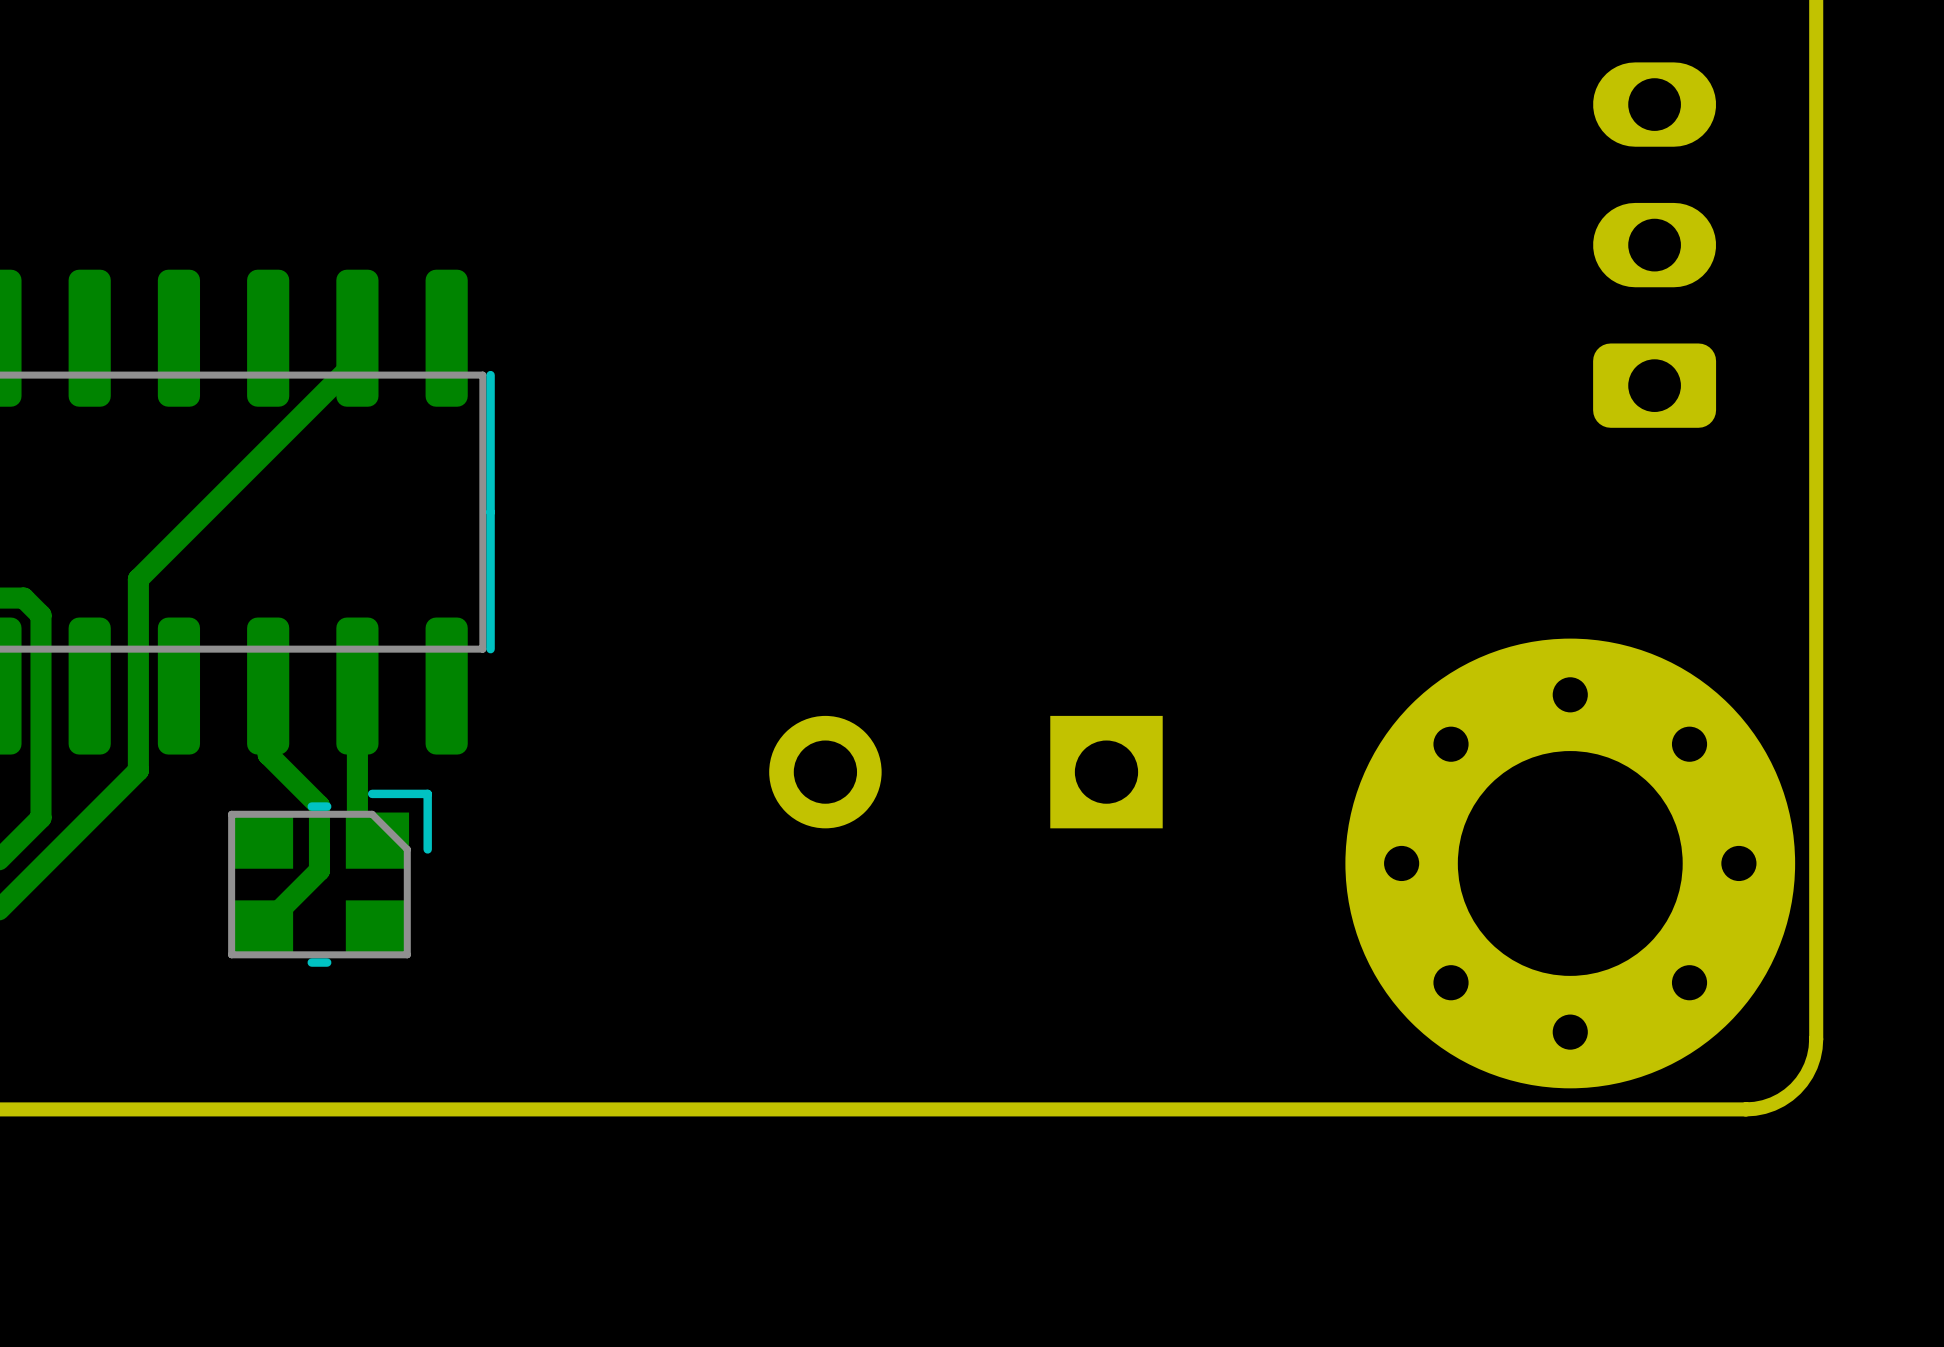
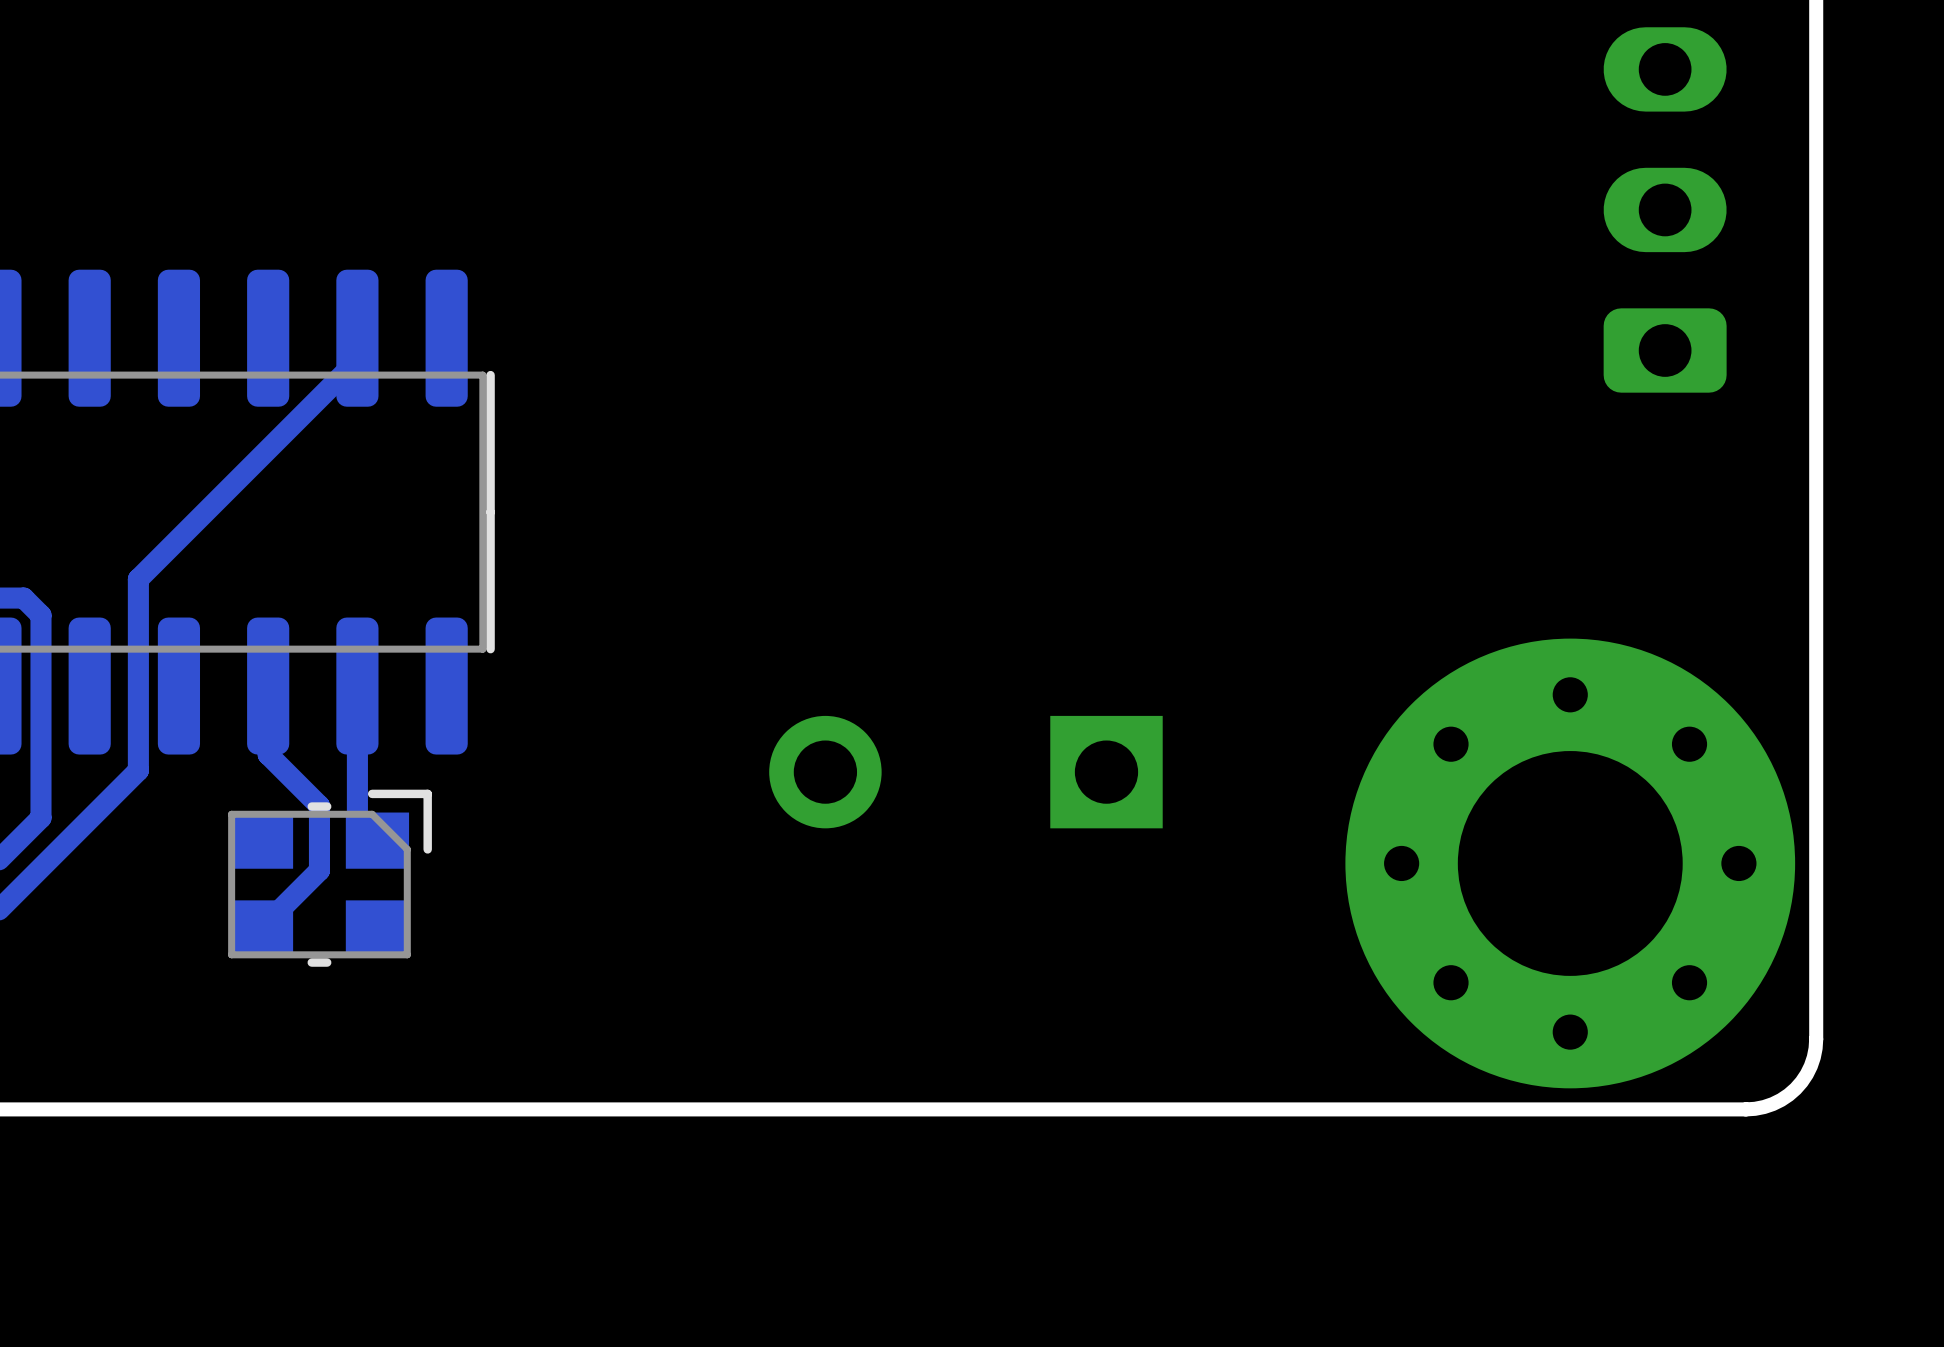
part position: (1654, 245) -> (1665, 209)

